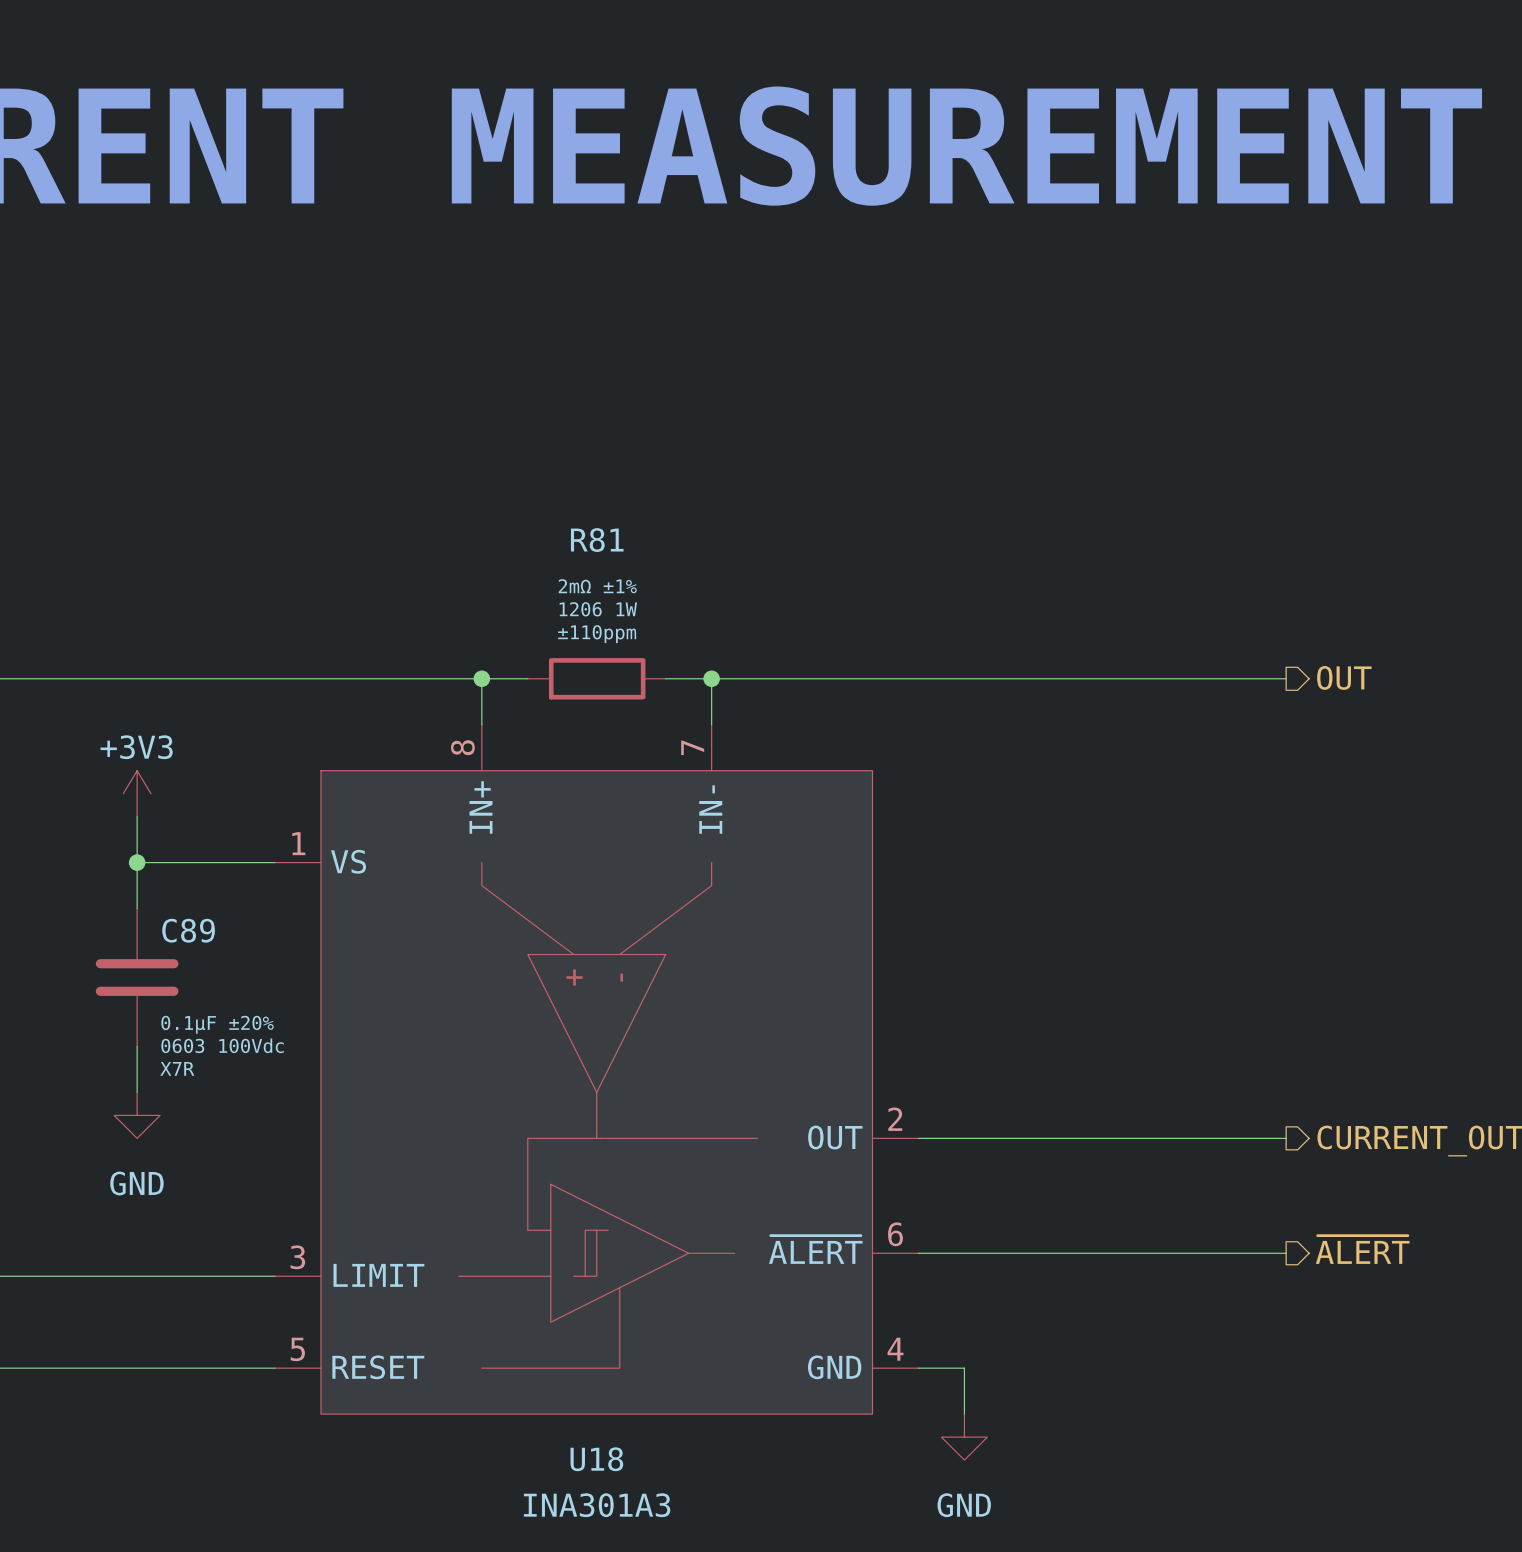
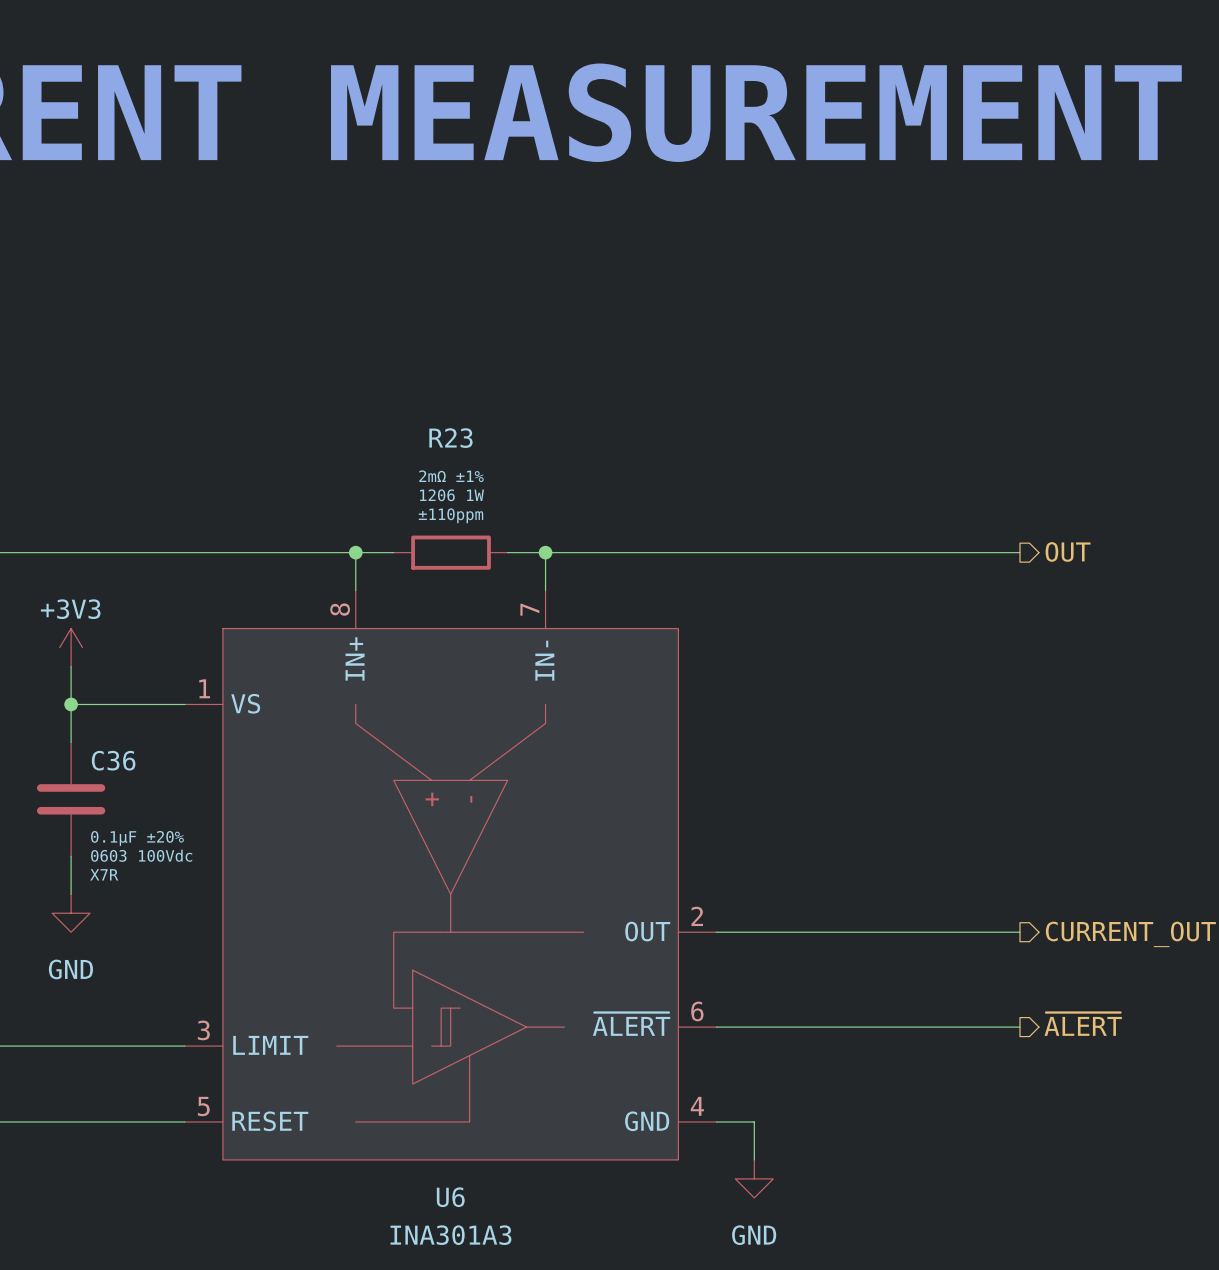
R81 name: R81 (597, 540) -> R23 (450, 438)
C89 name: C89 (188, 930) -> C36 (113, 760)
U18 name: U18 (596, 1459) -> U6 (450, 1197)

